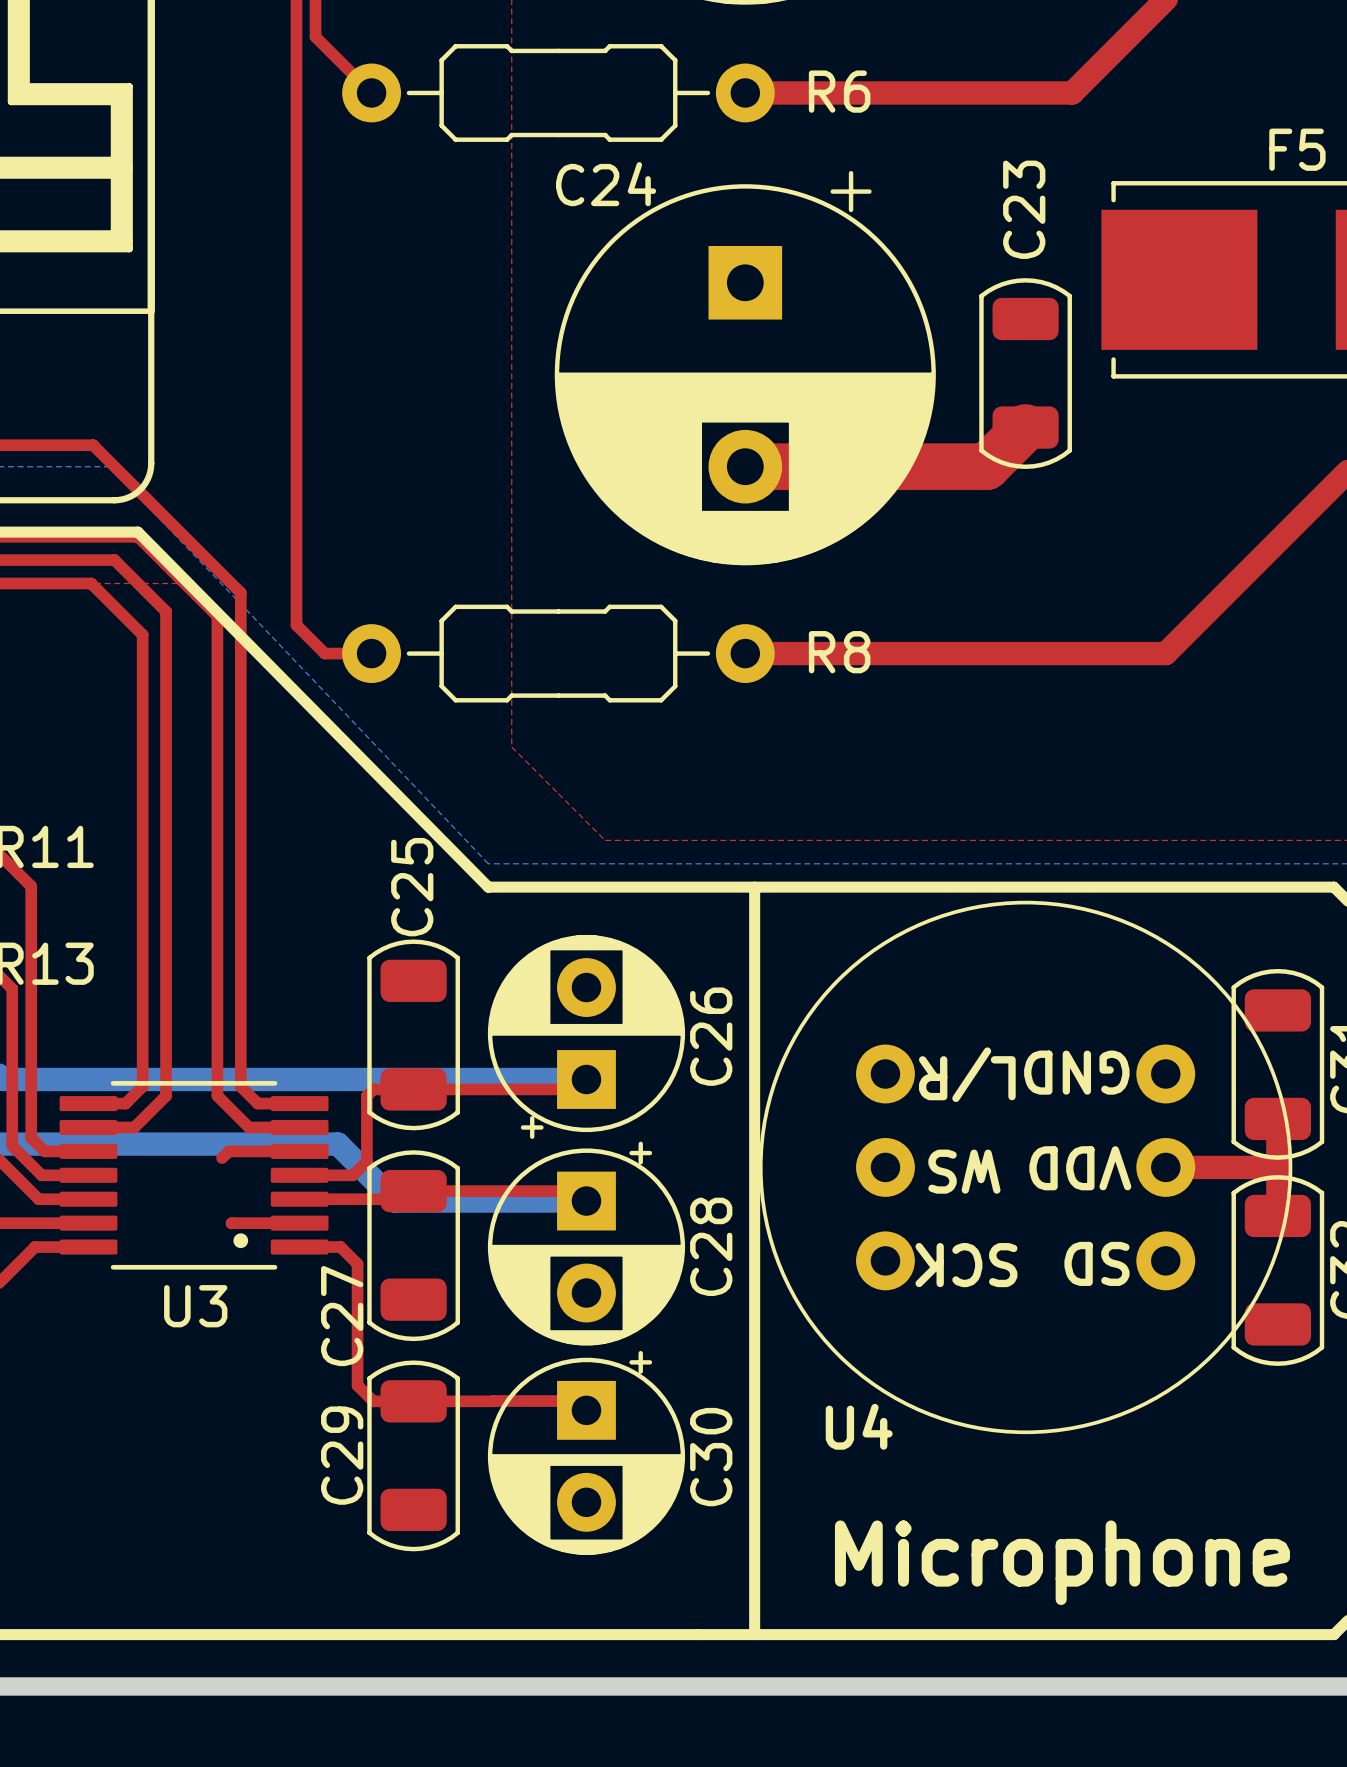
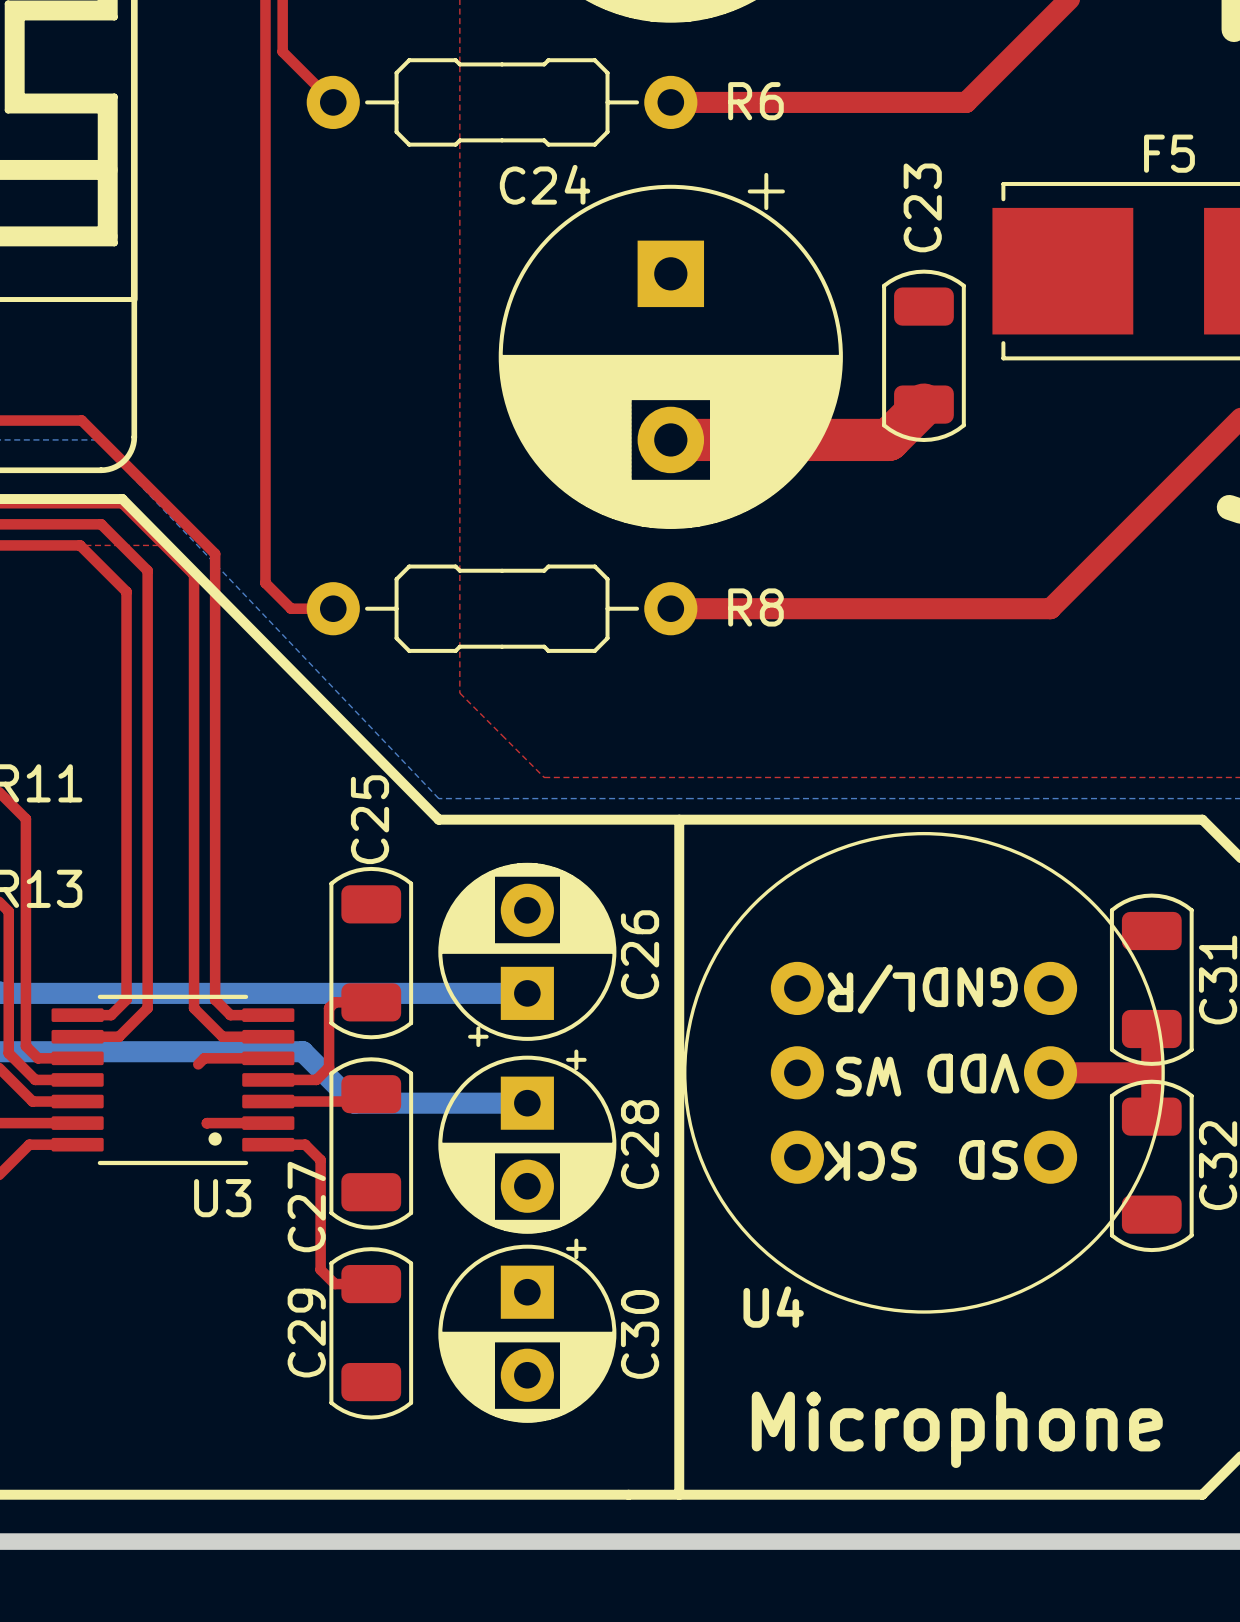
top track: (413, 1089) (576, 1089) -> none
top track: (413, 1191) (576, 1191) -> none
U3 name position: U3 (195, 1306) -> U3 (222, 1198)
top track: (413, 1401) (493, 1401) -> none
top track: (493, 1401) (577, 1401) -> none

